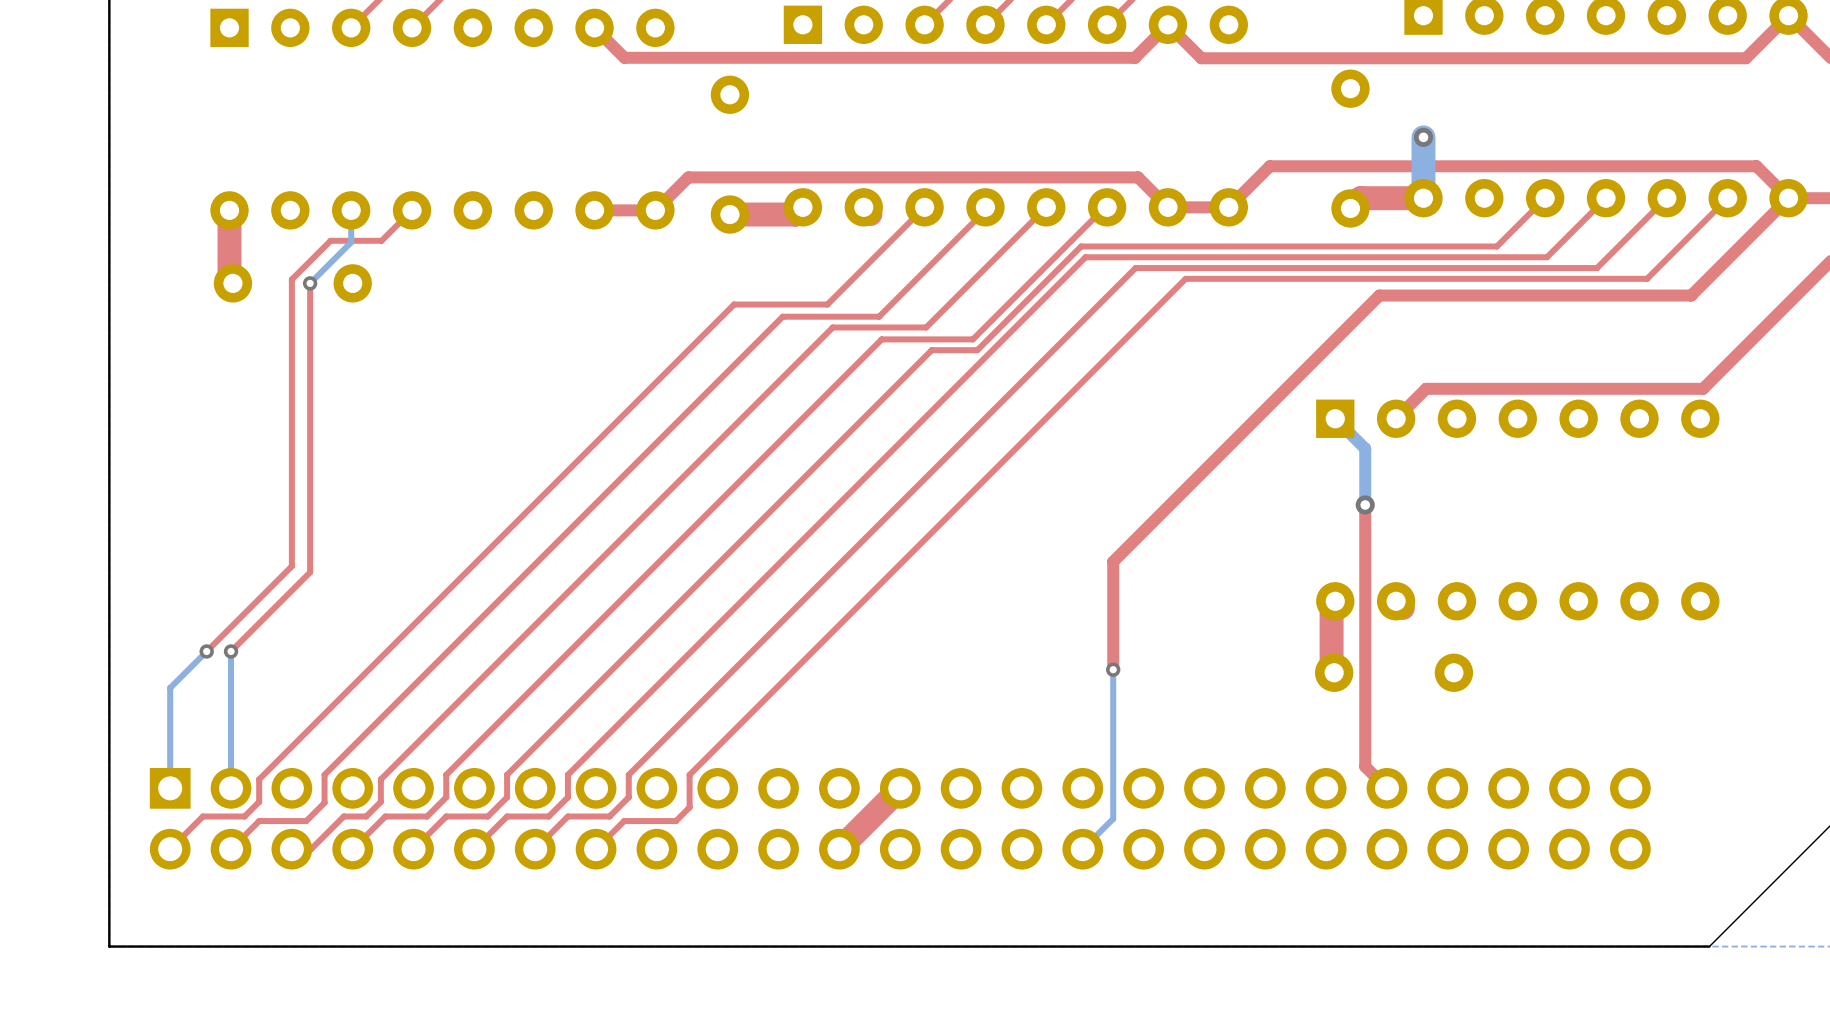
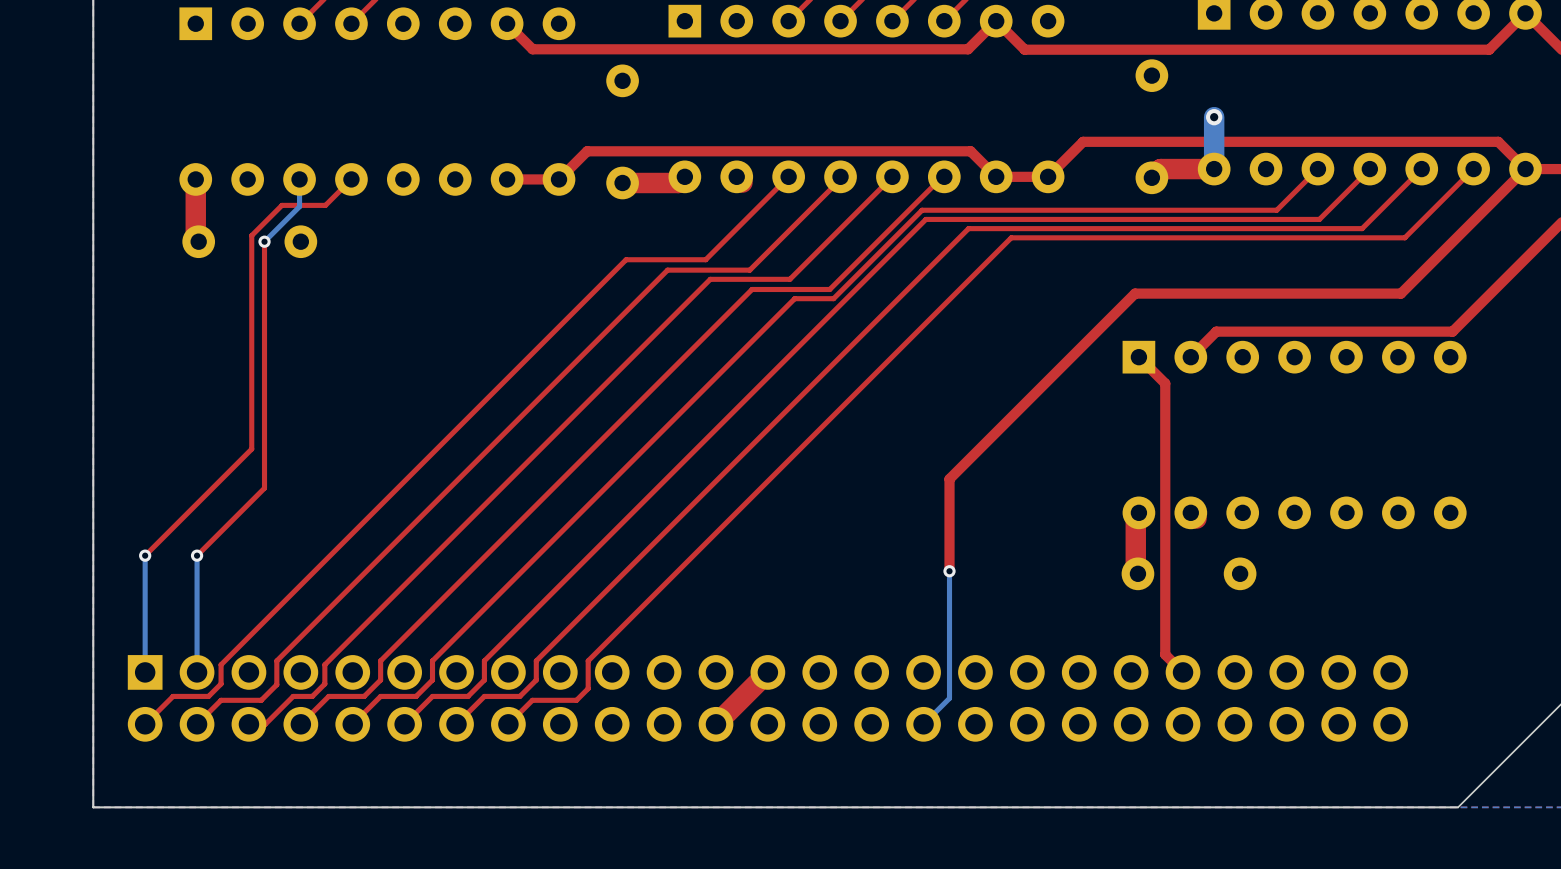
top track: (295, 276) (291, 279) (291, 566) (206, 651) -> (251, 235) (251, 449) (145, 555)
top track: (1691, 295) (1379, 295) (1330, 344) -> (1442, 252) (1400, 293) (1135, 293)
bottom track: (1335, 418) (1365, 448) (1365, 504) -> none
top track: (1365, 504) (1366, 767) -> (1138, 357) (1165, 383) (1165, 654)
via: (1365, 504) -> none
bottom track: (206, 651) (170, 687) -> (145, 555) (145, 586)
via position: (206, 651) -> (145, 555)

